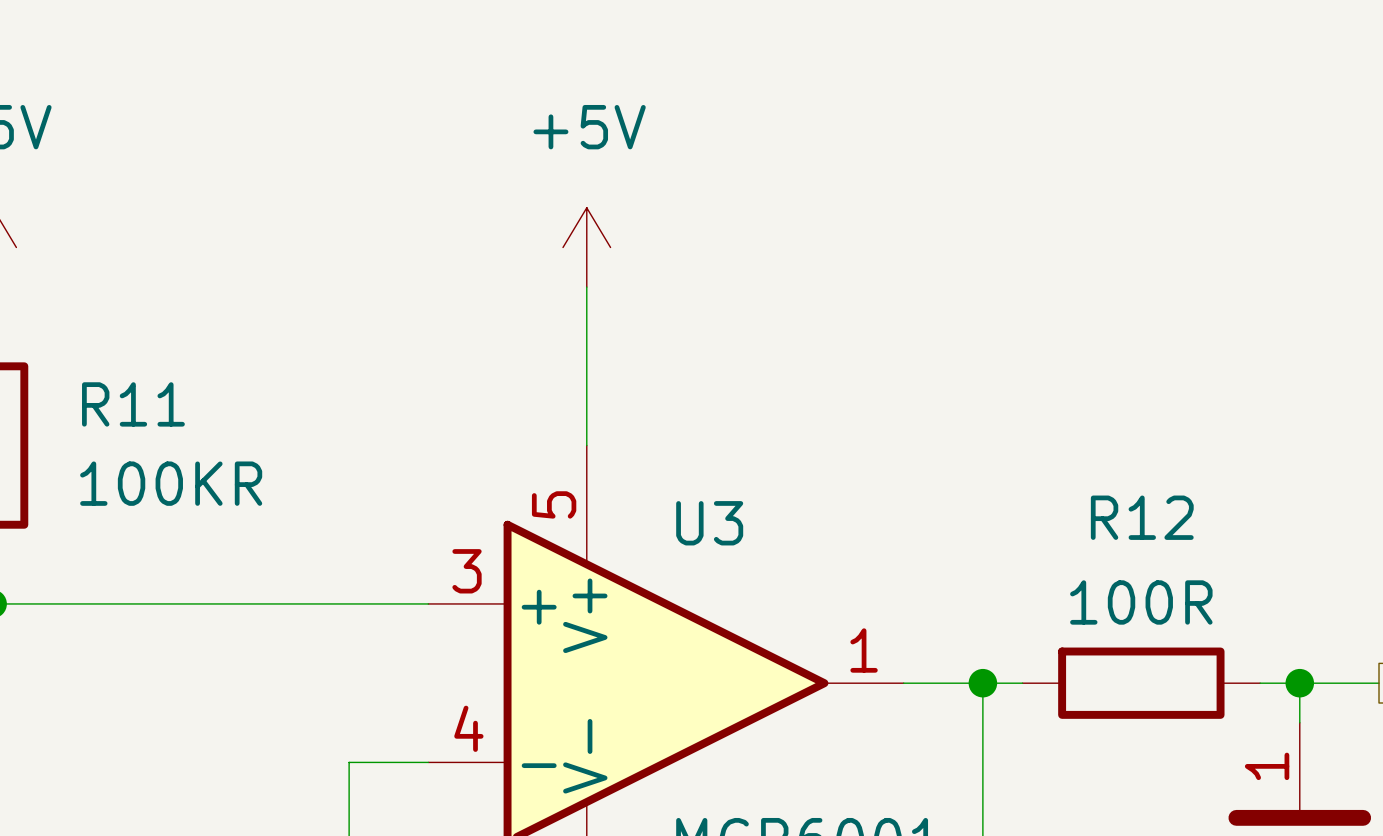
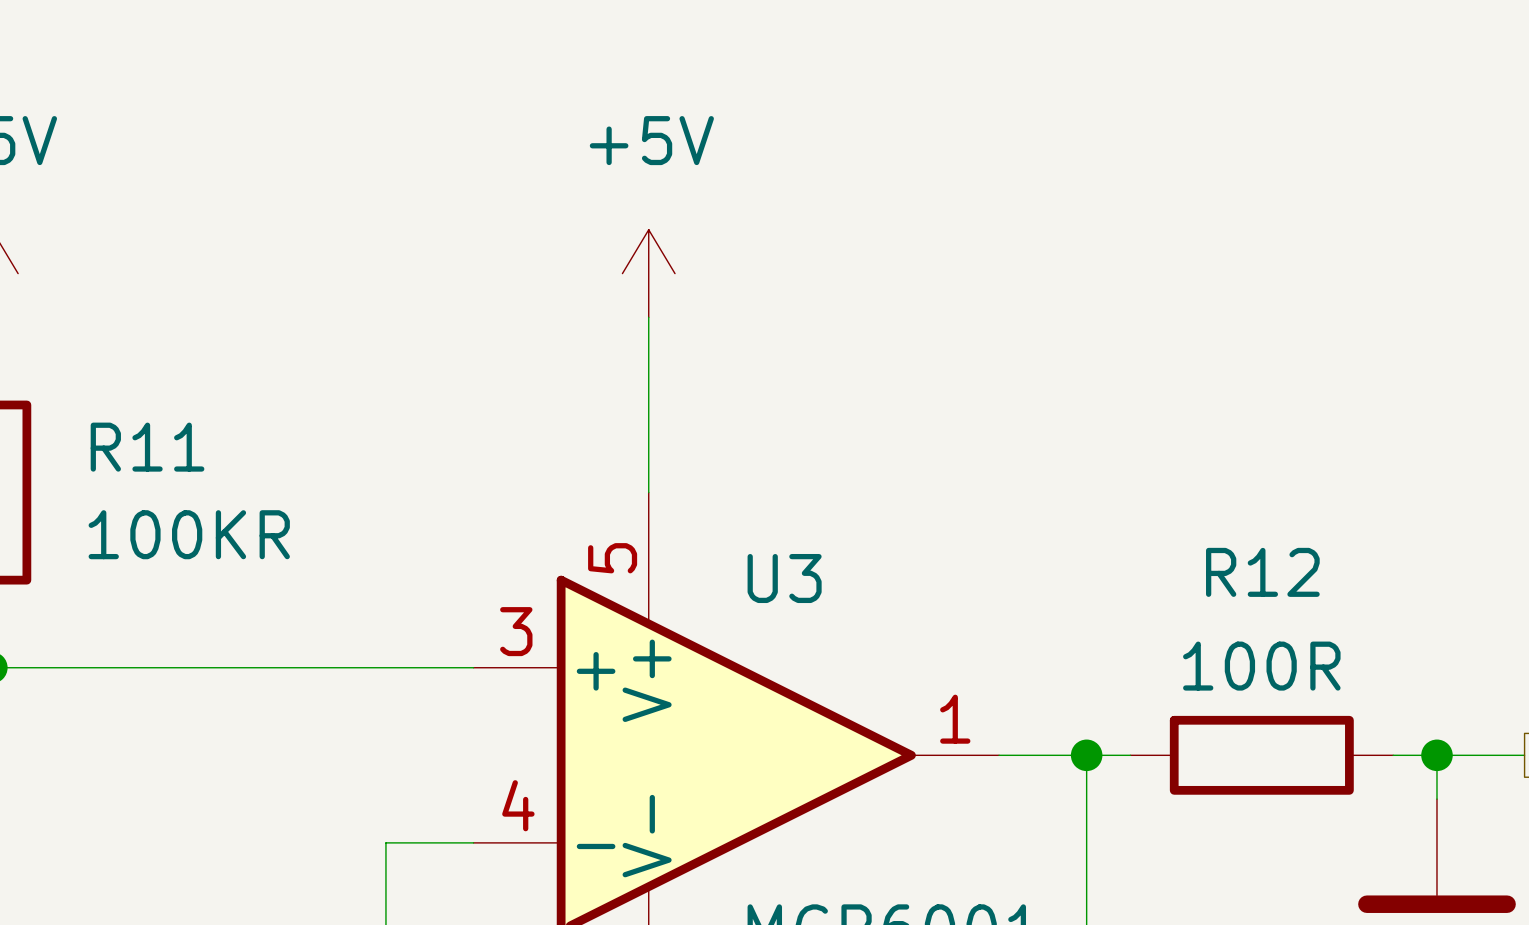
part pin number: 1 (1267, 766) -> none

